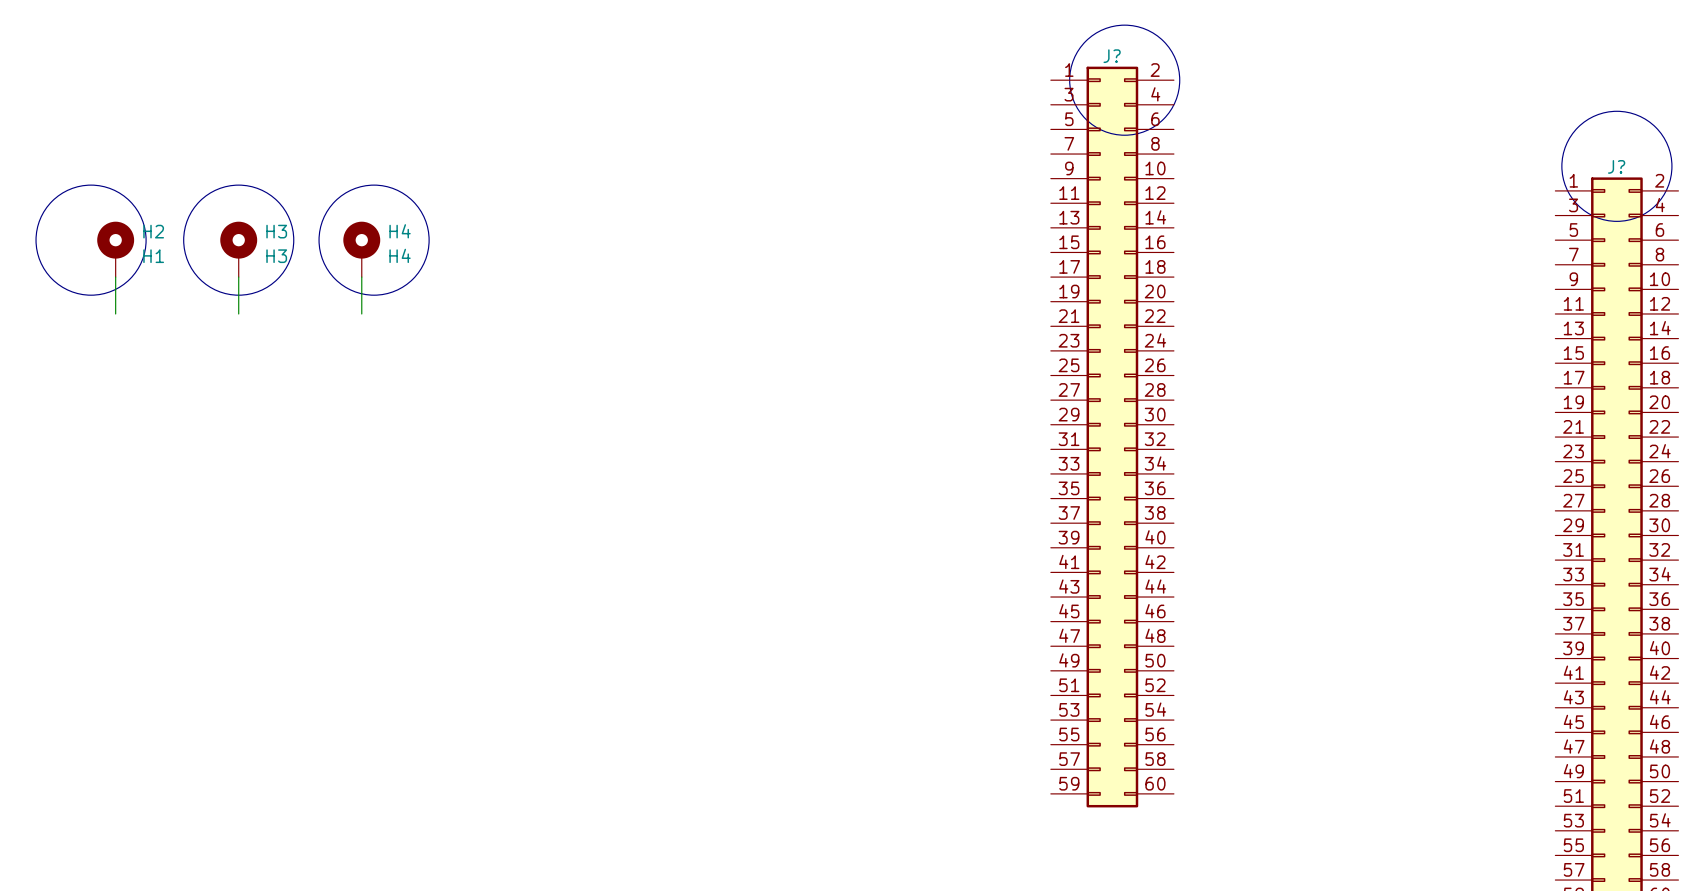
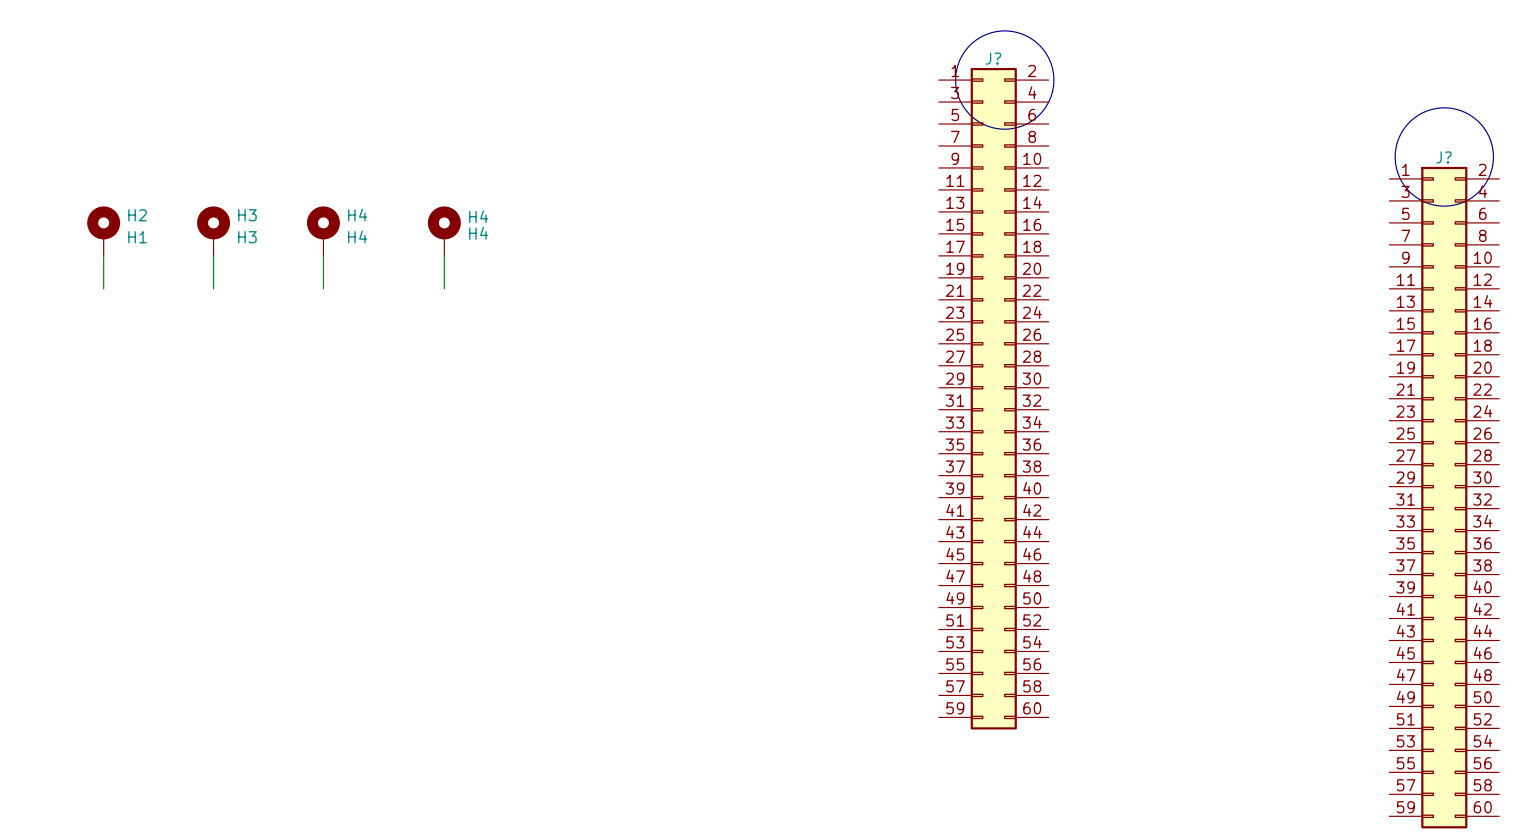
drawing: [36, 185, 147, 296] -> none
drawing: [183, 185, 294, 296] -> none
drawing: [319, 185, 430, 296] -> none
H4: none -> H4 (444, 231)
wire: none -> (444, 255) (444, 288)

